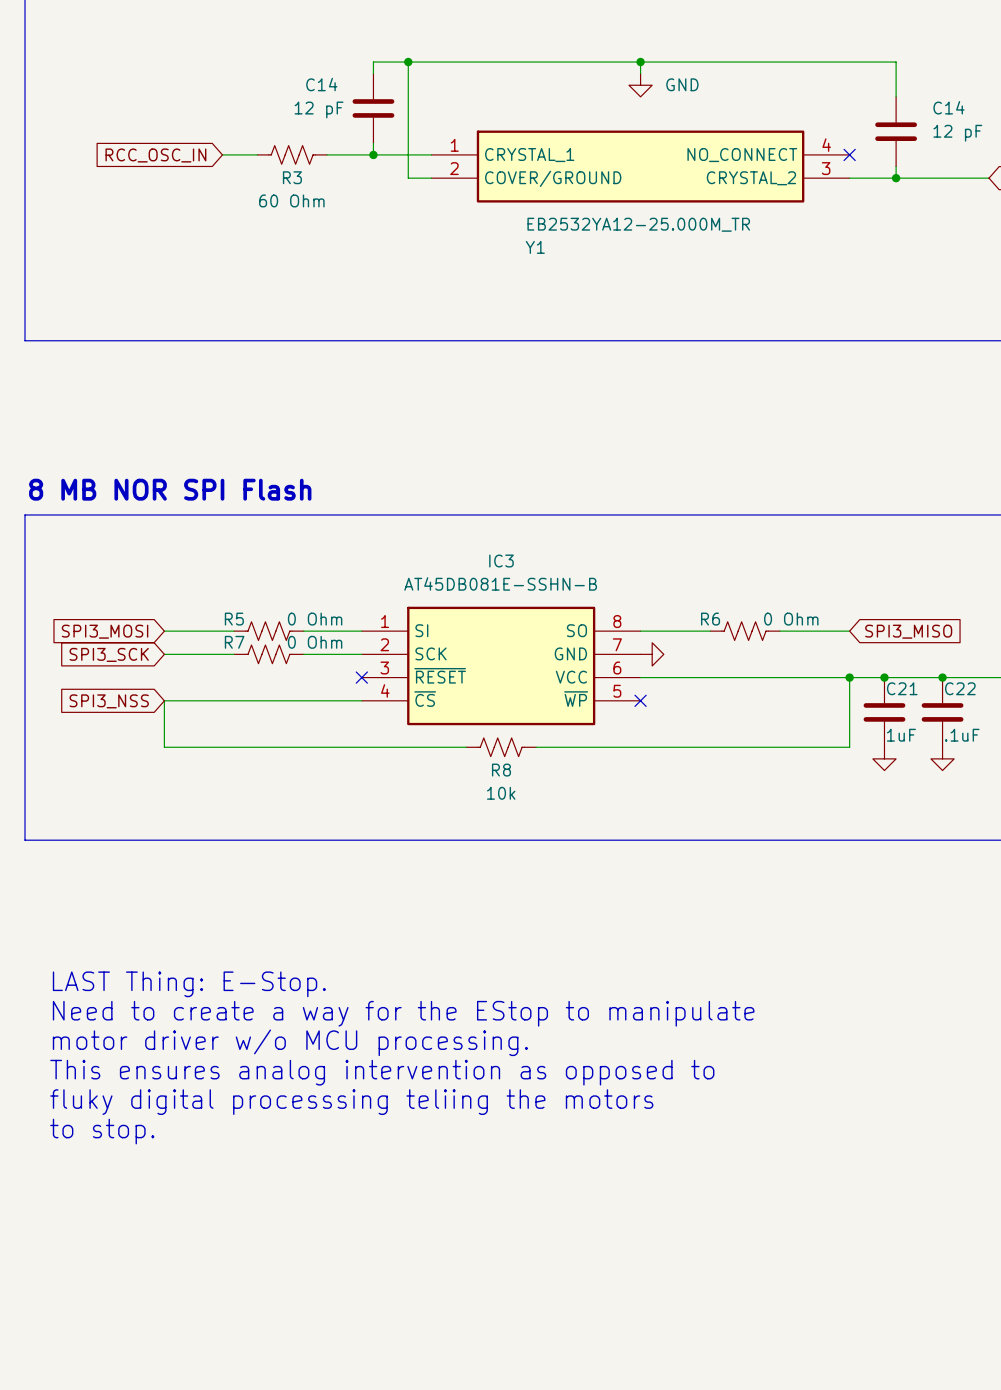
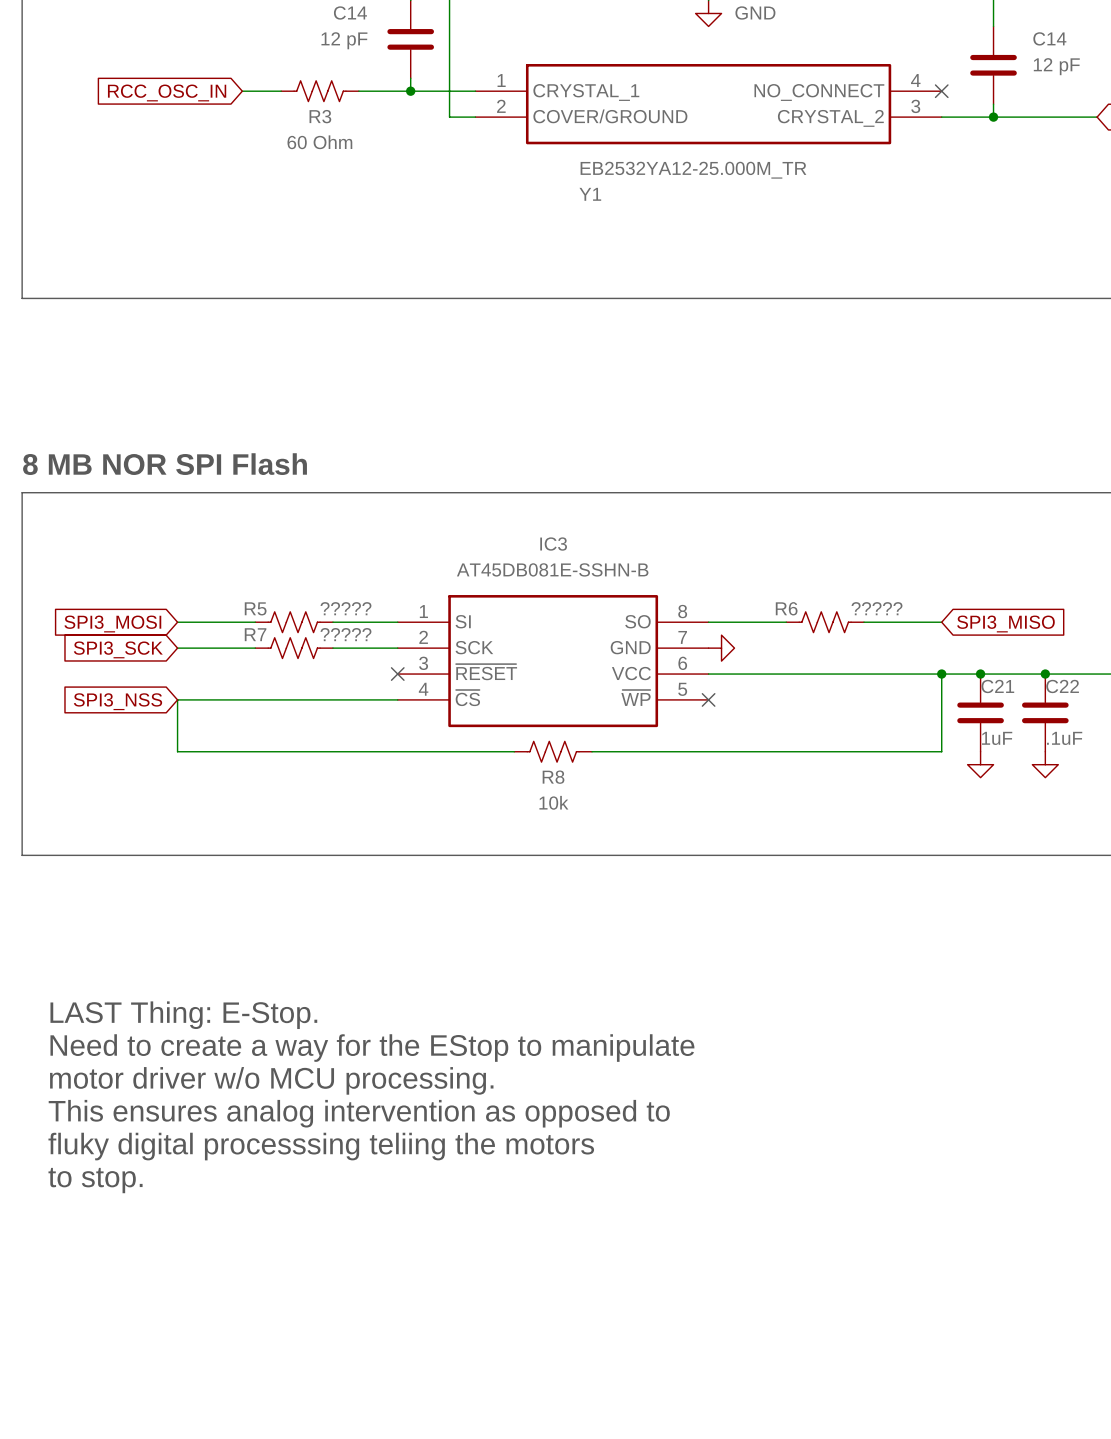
R5 value: 0 Ohm (315, 619) -> ????? (345, 608)
R6 value: 0 Ohm (791, 619) -> ????? (877, 608)
R7 value: 0 Ohm (315, 642) -> ????? (345, 634)

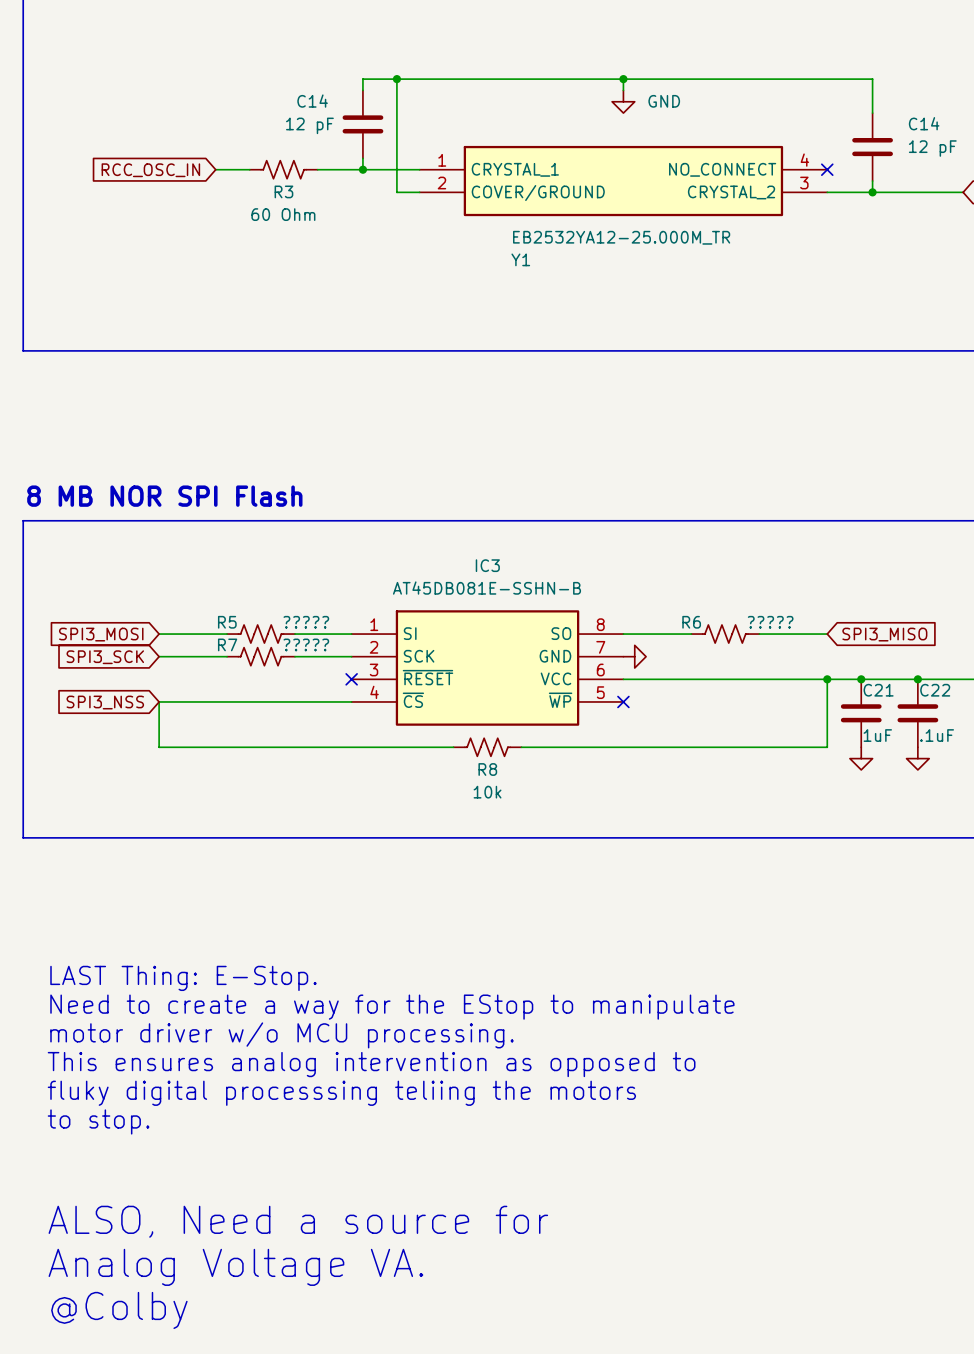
text: none -> ALSO, Need a source for (298, 1221)
text: none -> Analog Voltage VA. (235, 1267)
text: none -> @Colby (119, 1310)

